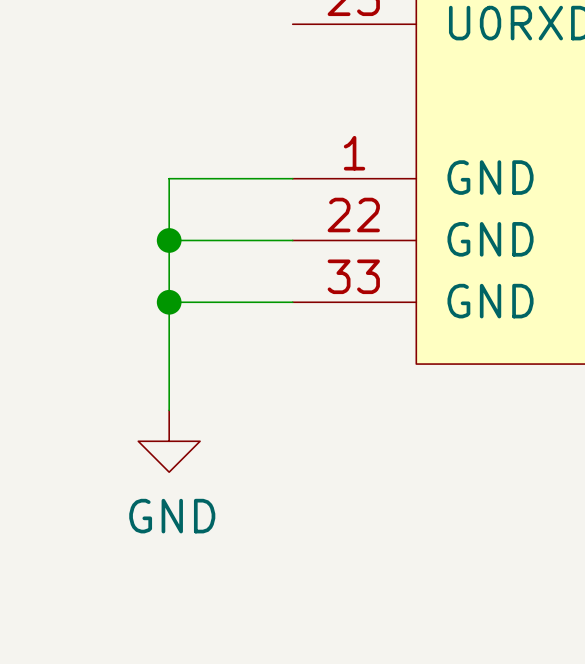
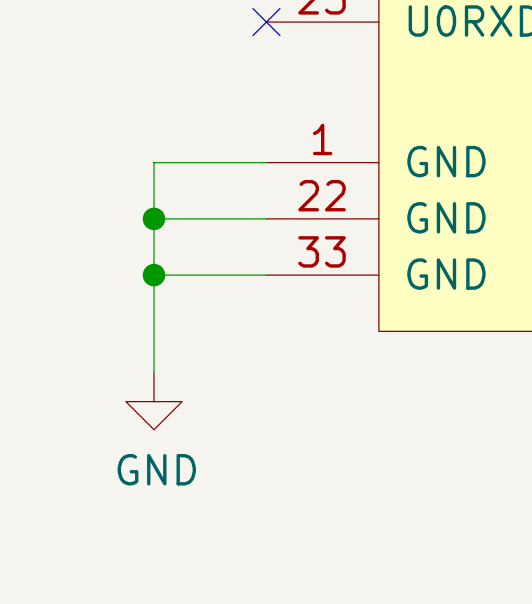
no-connect mark: none -> (266, 22)

